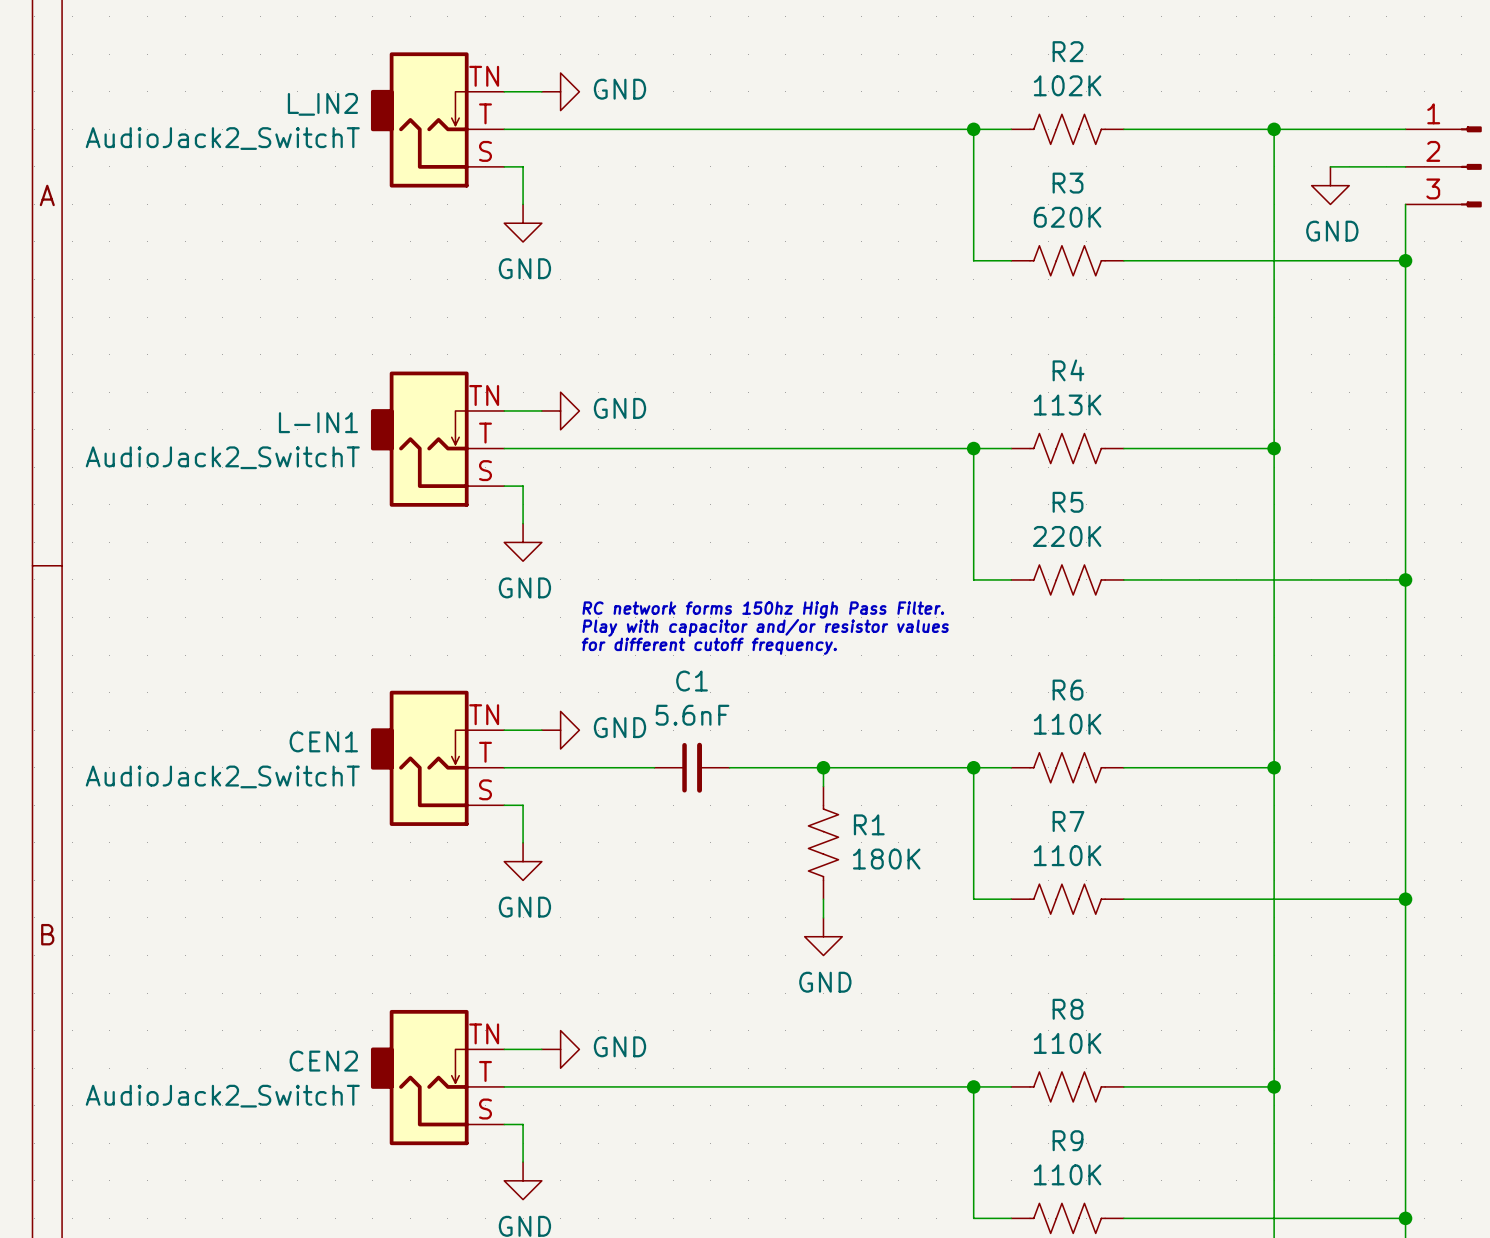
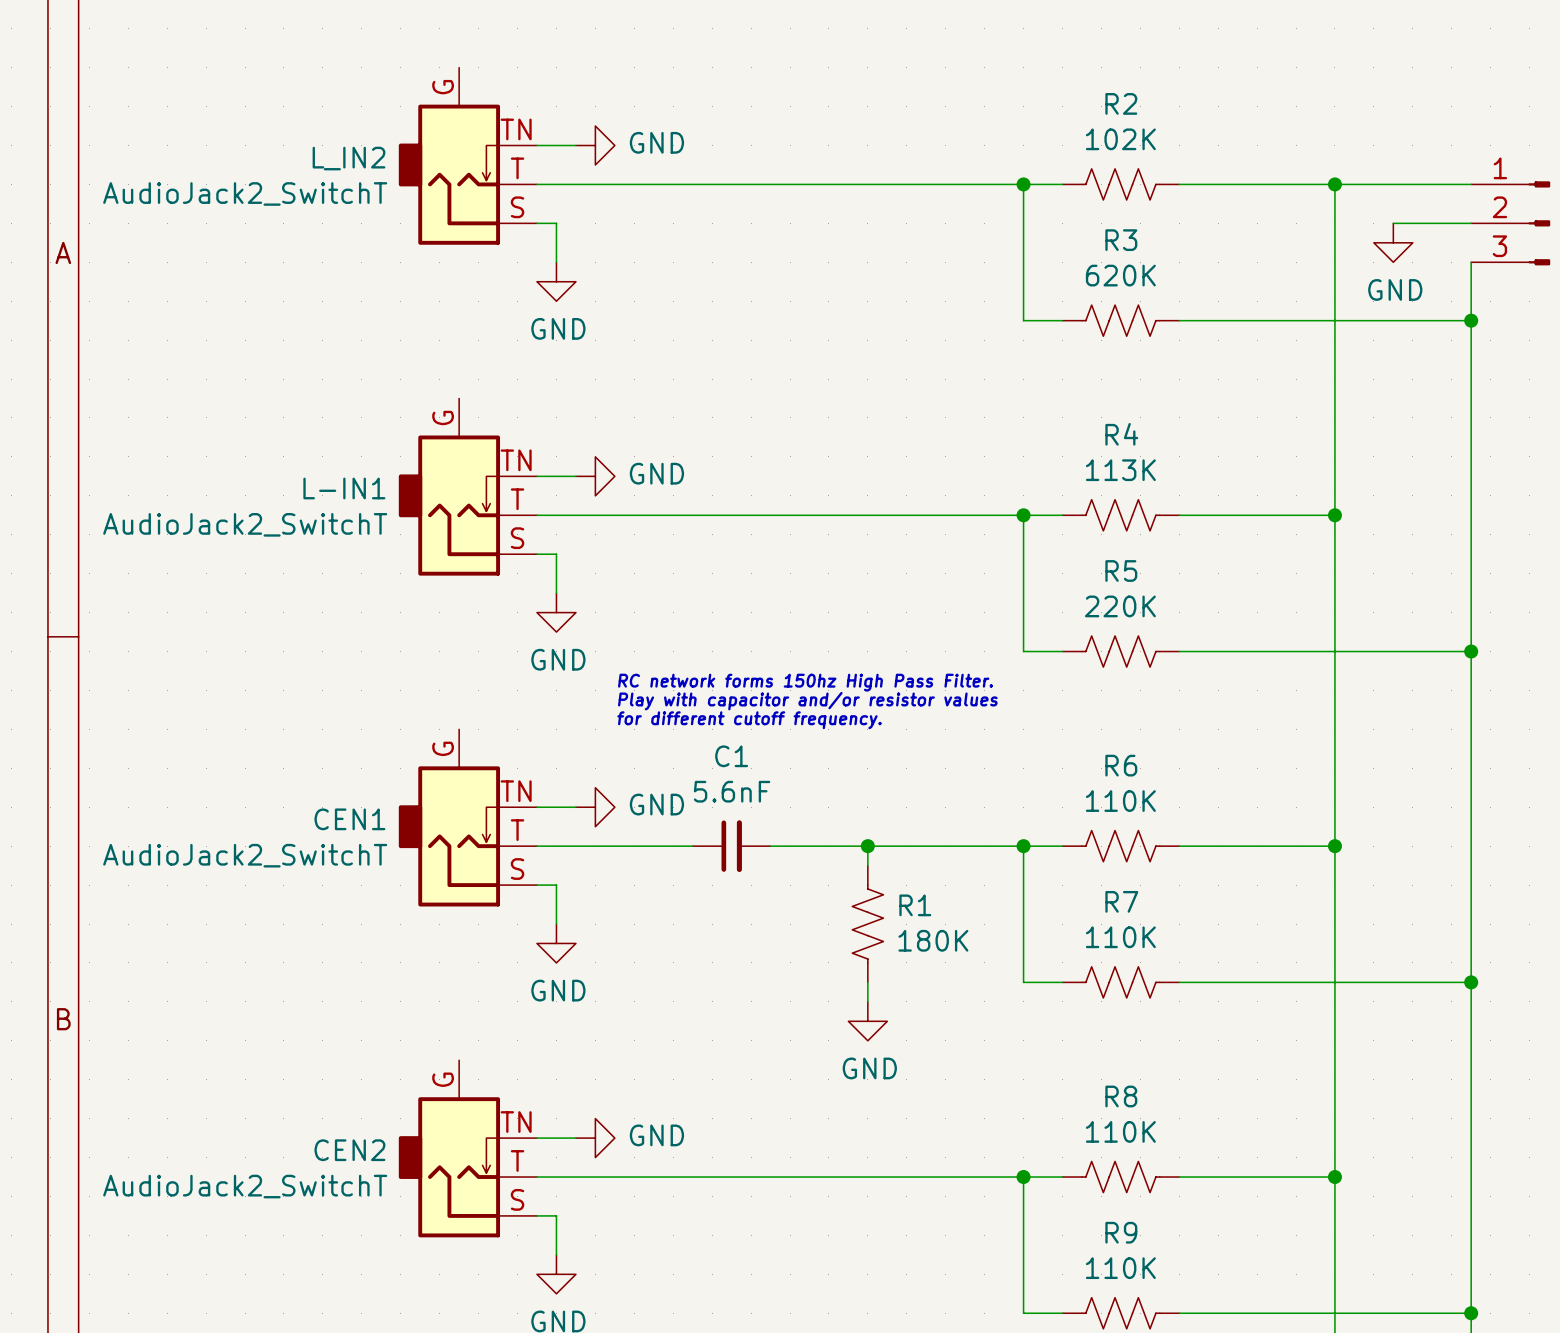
L_IN2 symbol: [370, 52, 505, 188] -> [398, 67, 537, 245]
L-IN1 symbol: [370, 371, 505, 507] -> [398, 398, 537, 576]
CEN1 symbol: [370, 690, 505, 826] -> [398, 729, 537, 907]
CEN2 symbol: [370, 1009, 505, 1146] -> [398, 1060, 537, 1238]

